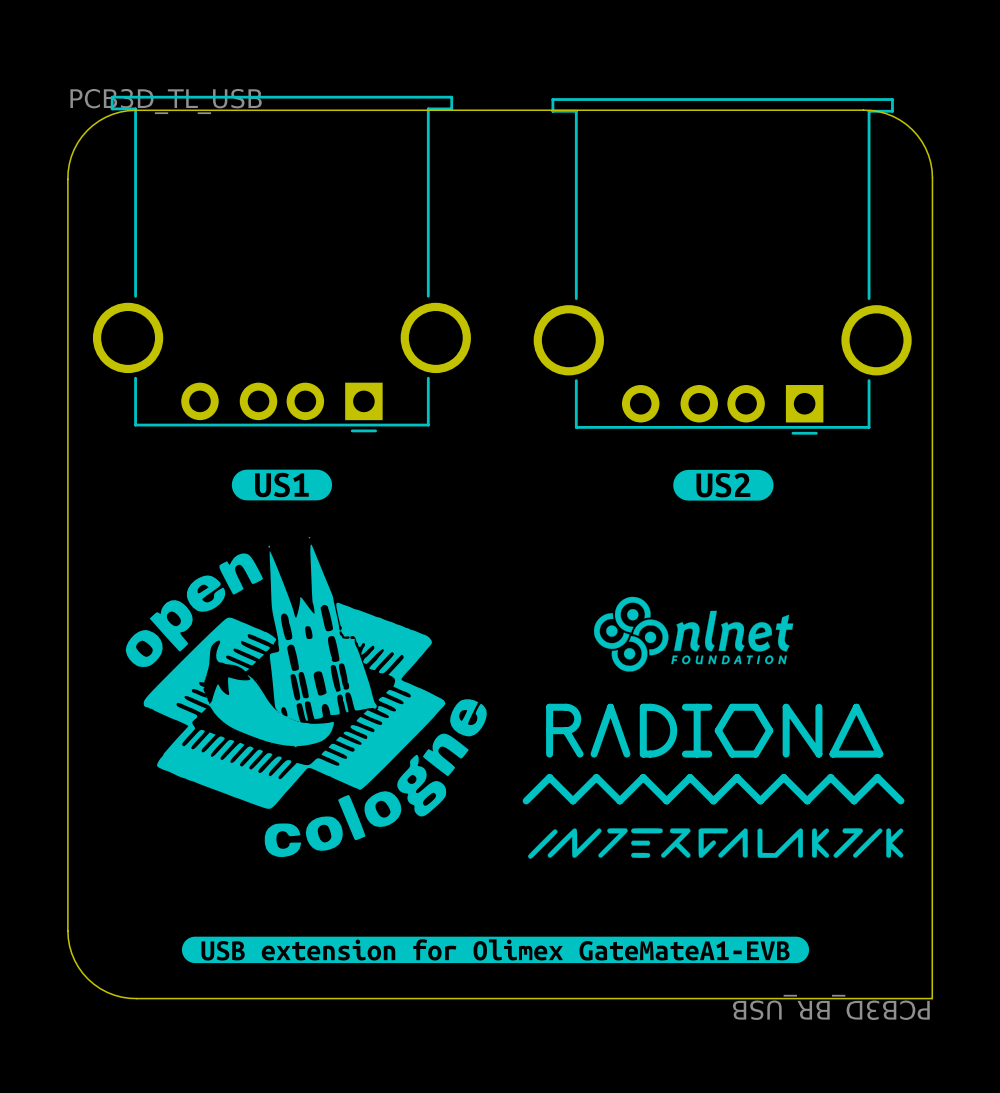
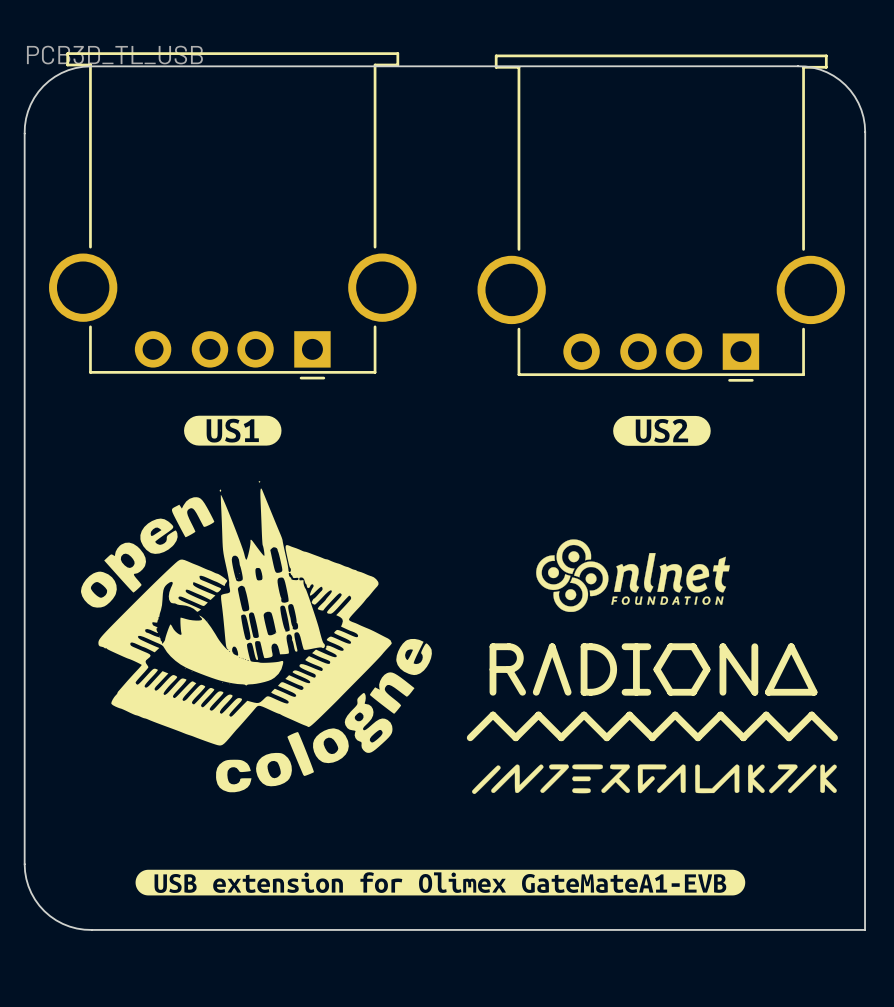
text: PCB3D_BR_USB (831, 1007) -> none

